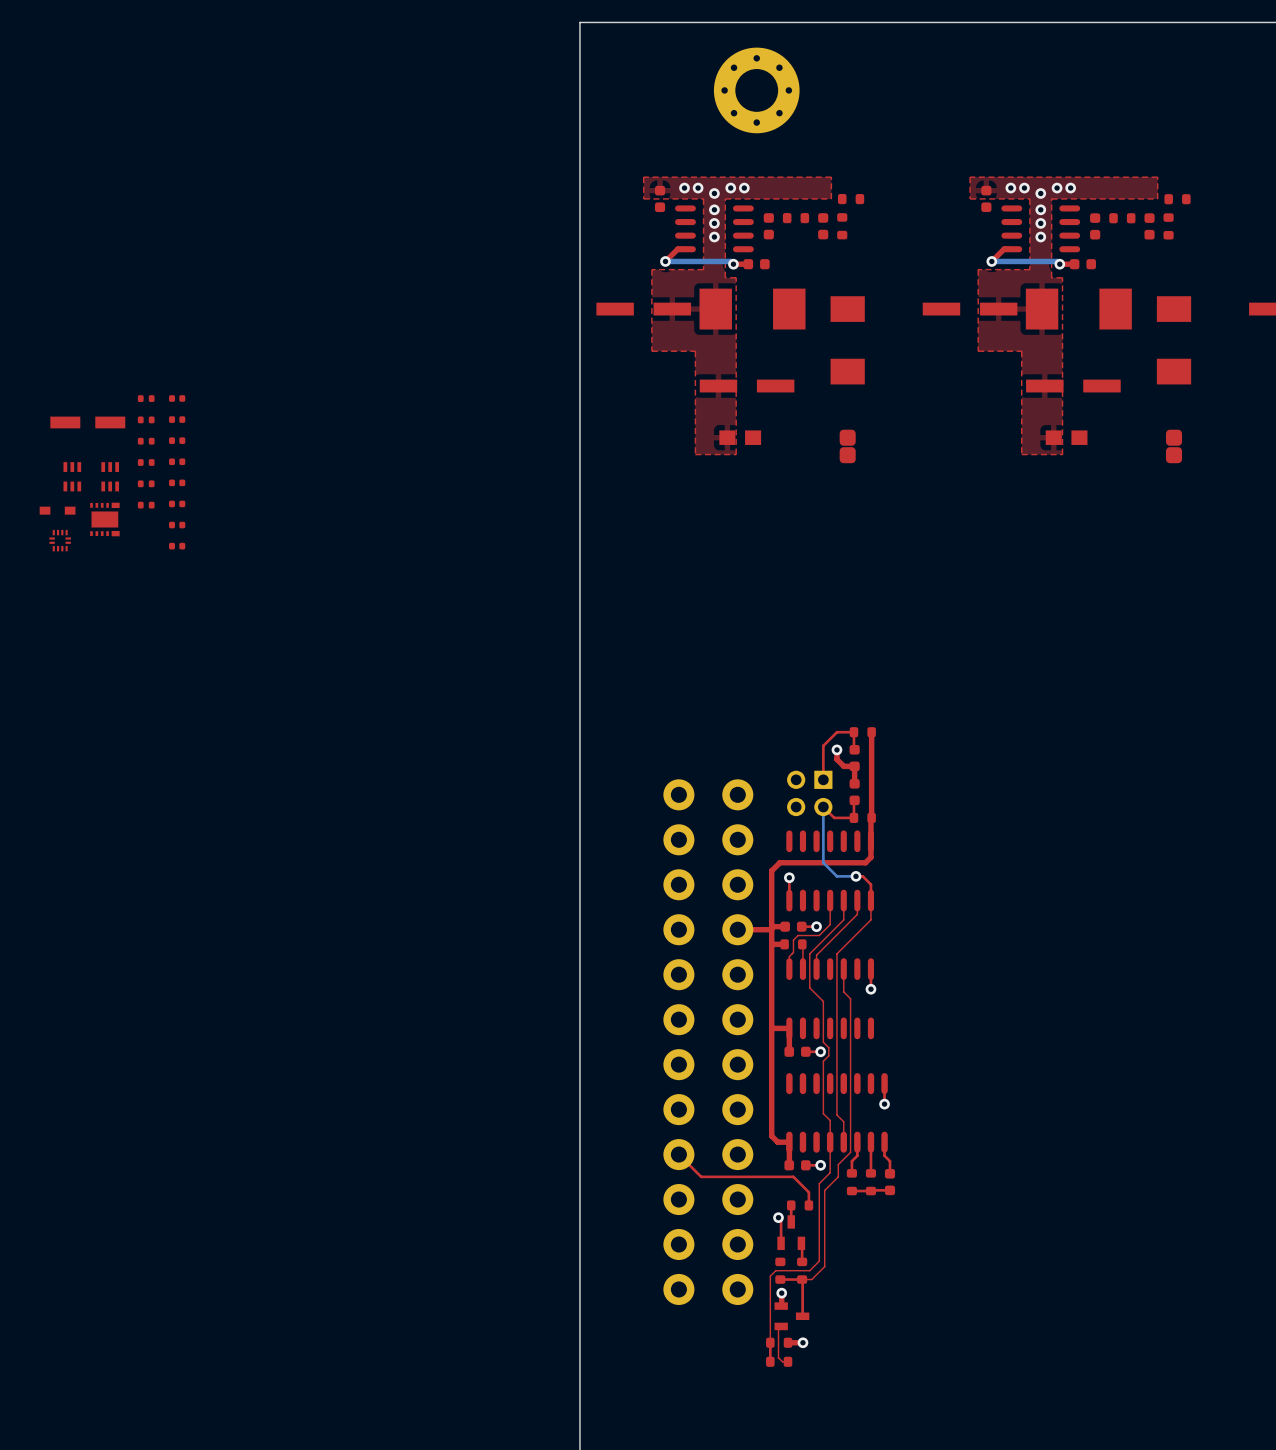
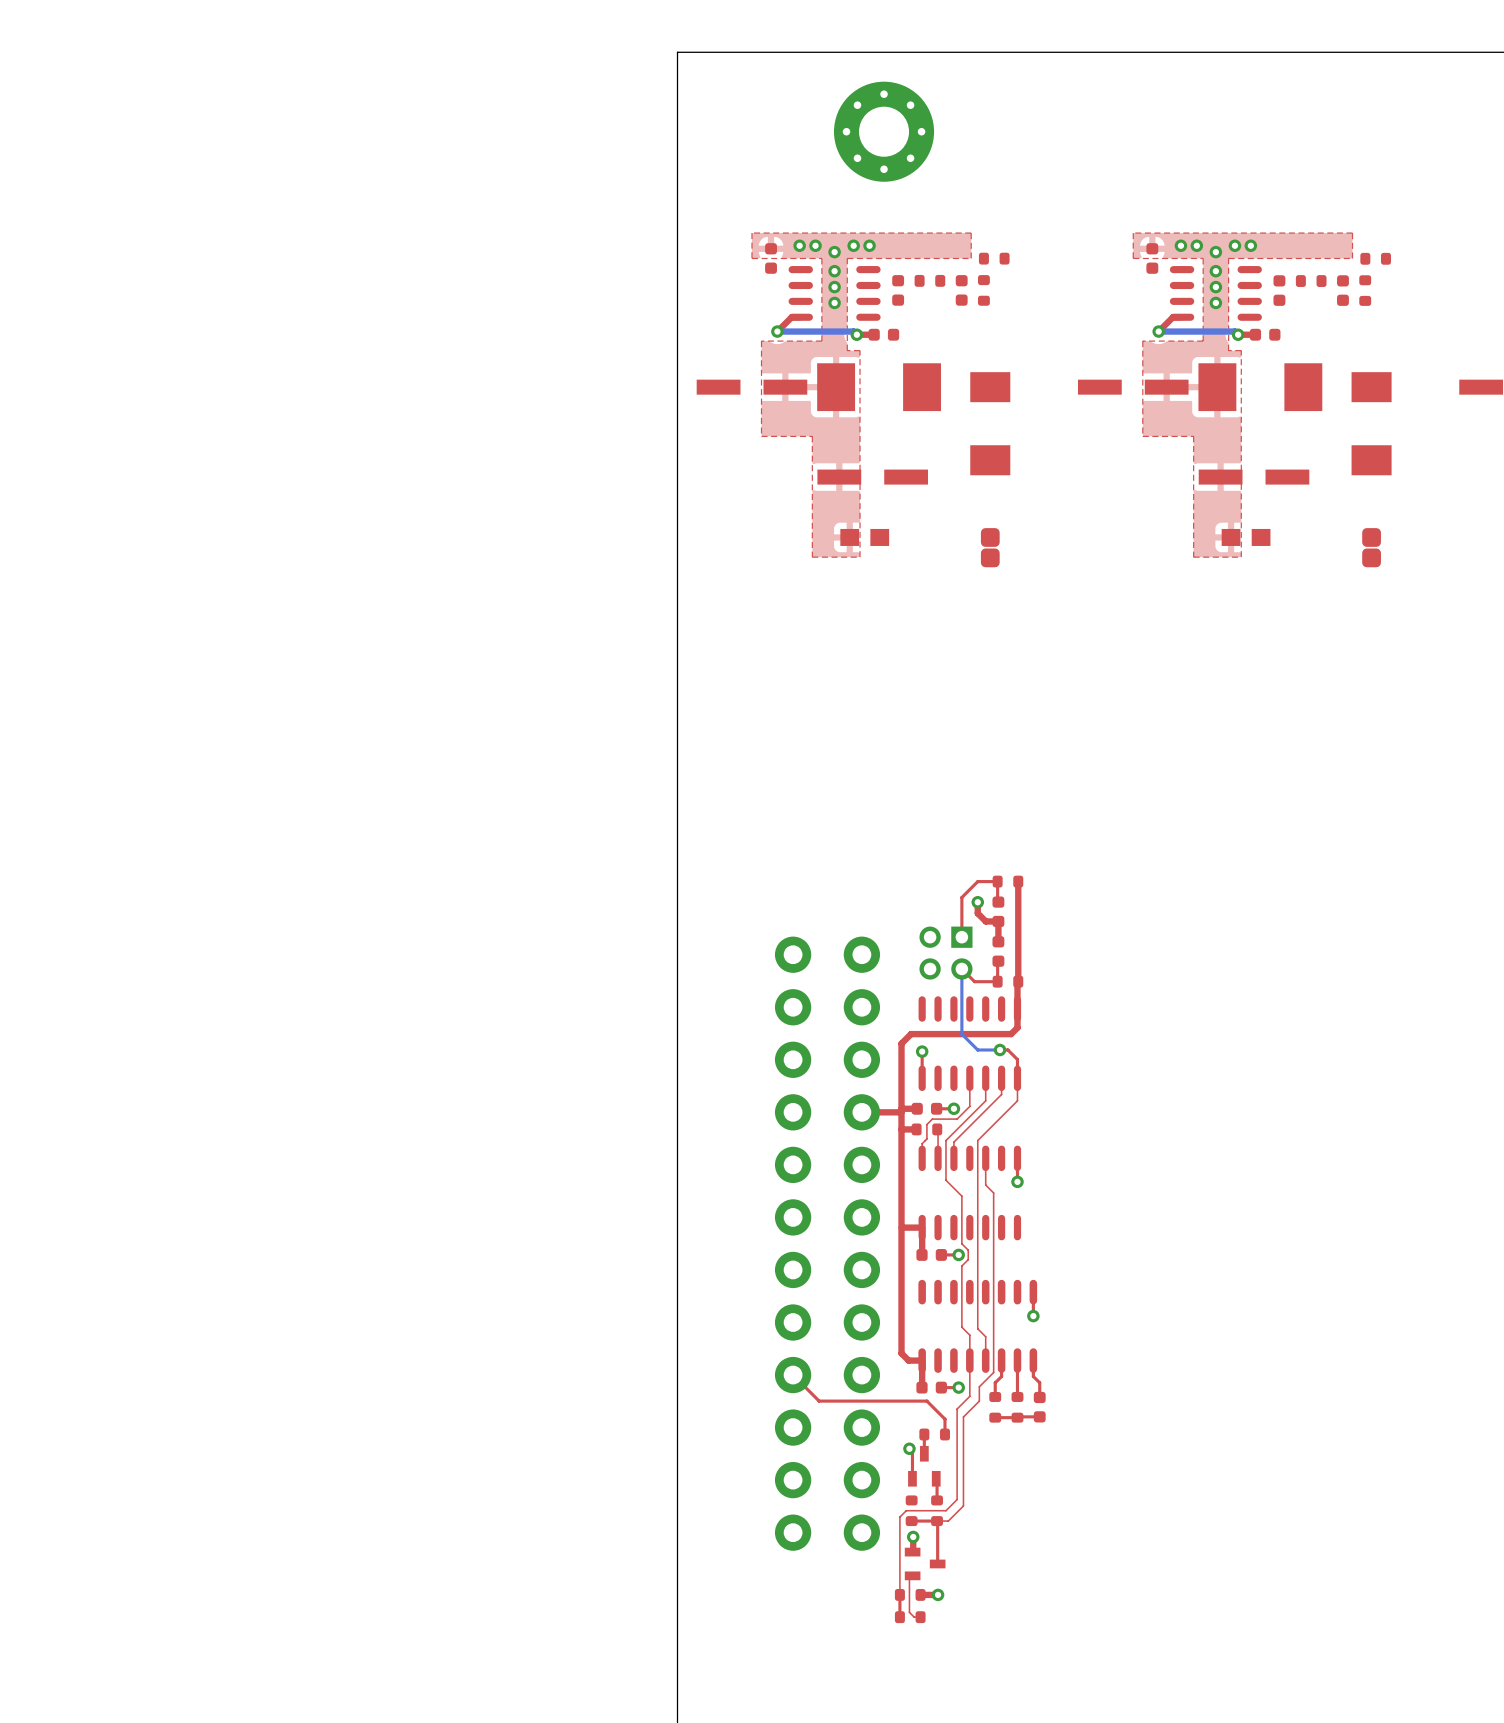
part: (146, 398) -> none
part: (177, 398) -> none
part: (146, 419) -> none
part: (177, 419) -> none
part: (87, 422) -> none
part: (177, 440) -> none
part: (146, 441) -> none
part: (177, 461) -> none
part: (146, 462) -> none
part: (72, 476) -> none
part: (110, 476) -> none
part: (177, 482) -> none
part: (146, 483) -> none
part: (177, 503) -> none
part: (146, 505) -> none
part: (57, 510) -> none
part: (104, 519) -> none
part: (177, 525) -> none
part: (60, 540) -> none
part: (177, 546) -> none

